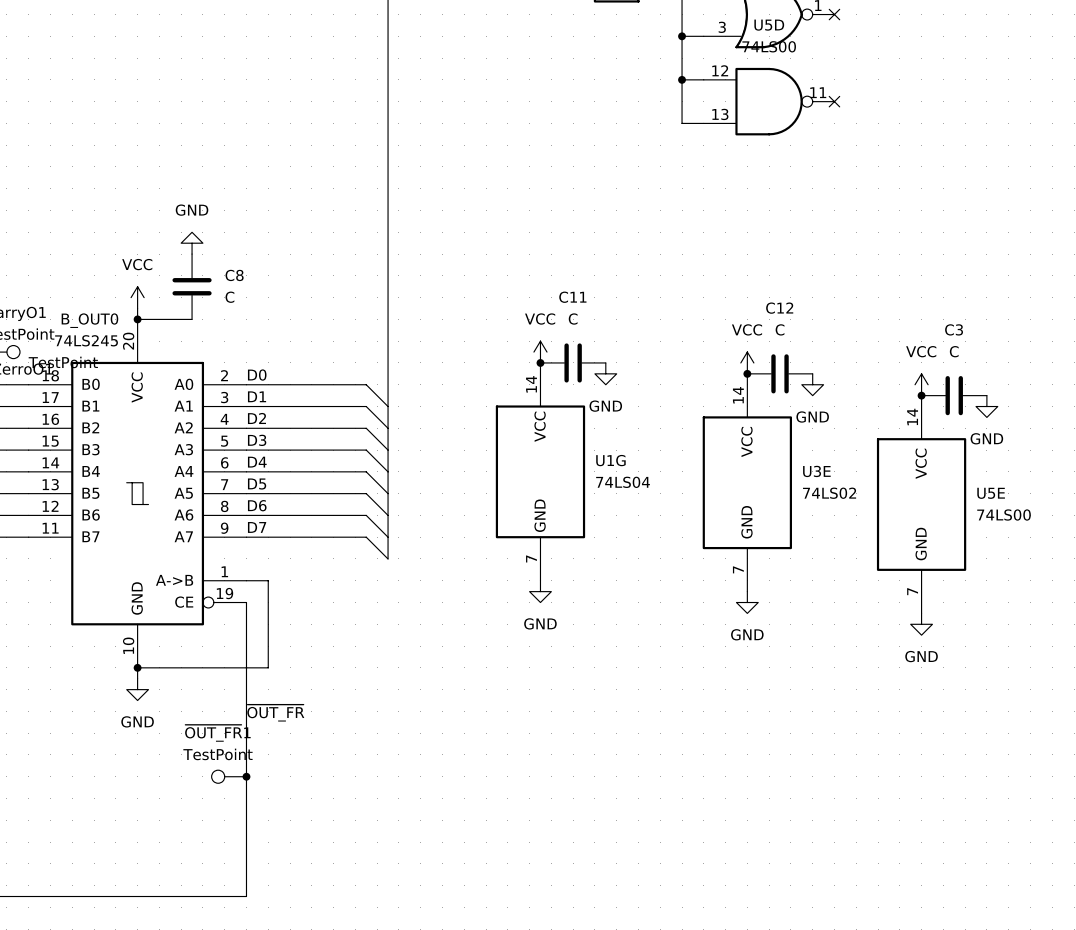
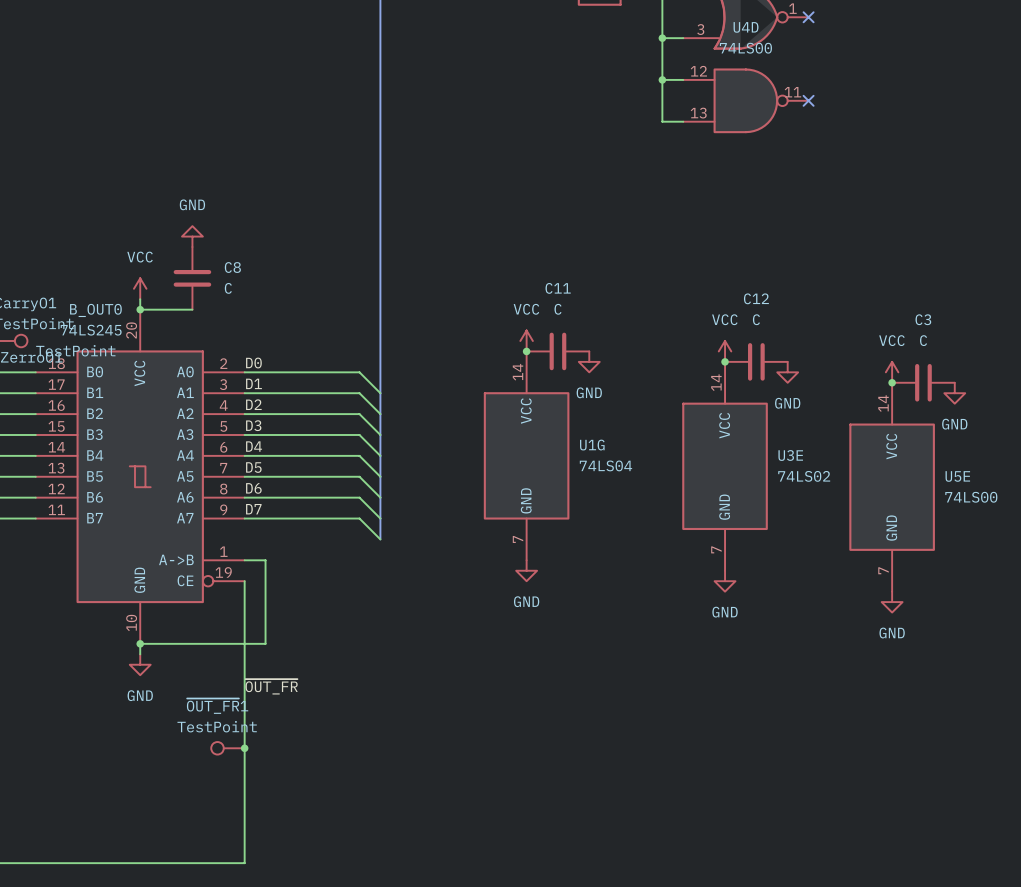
U5D name: U5D (769, 25) -> U4D (746, 27)

